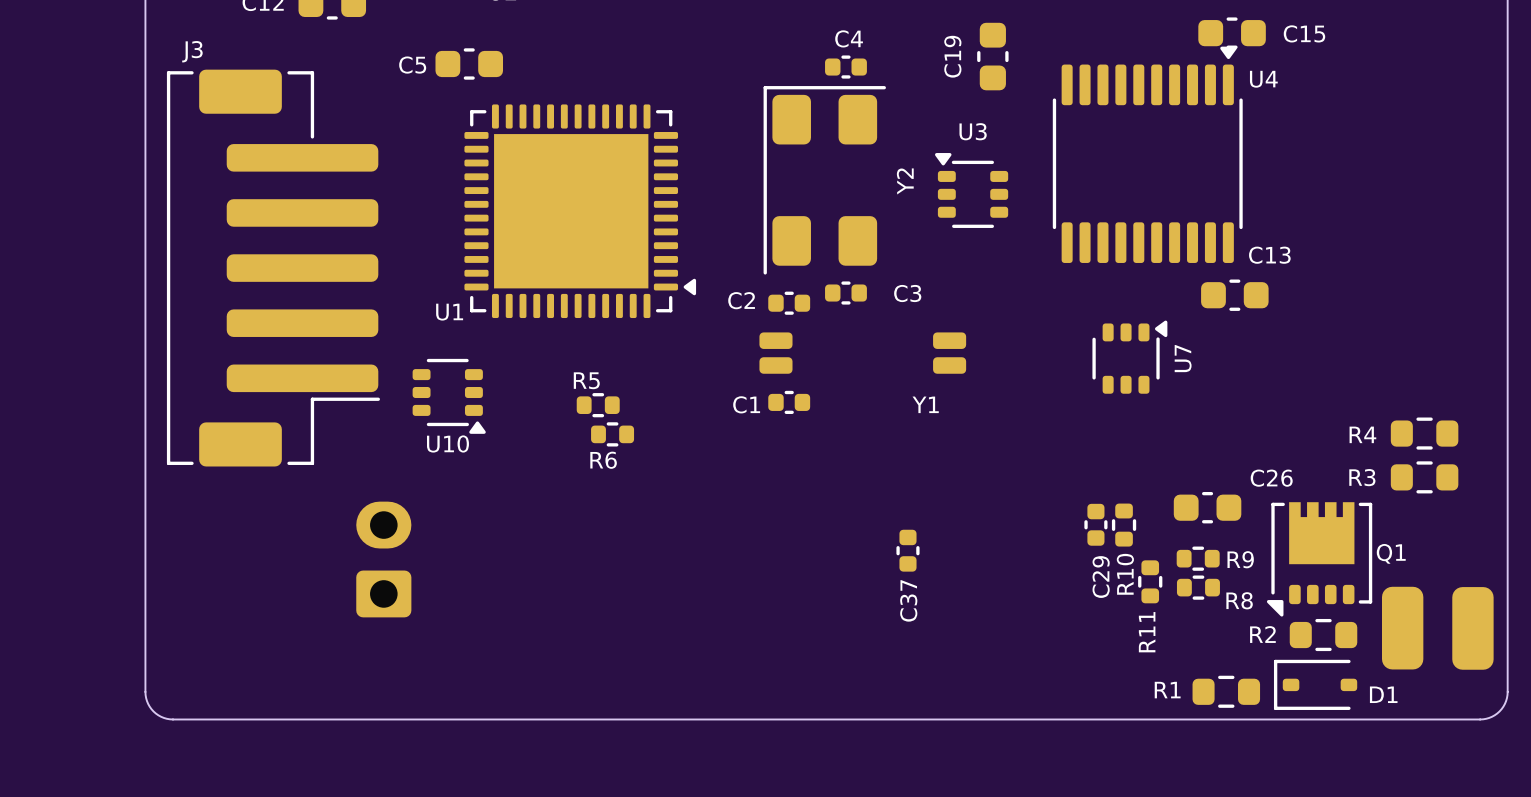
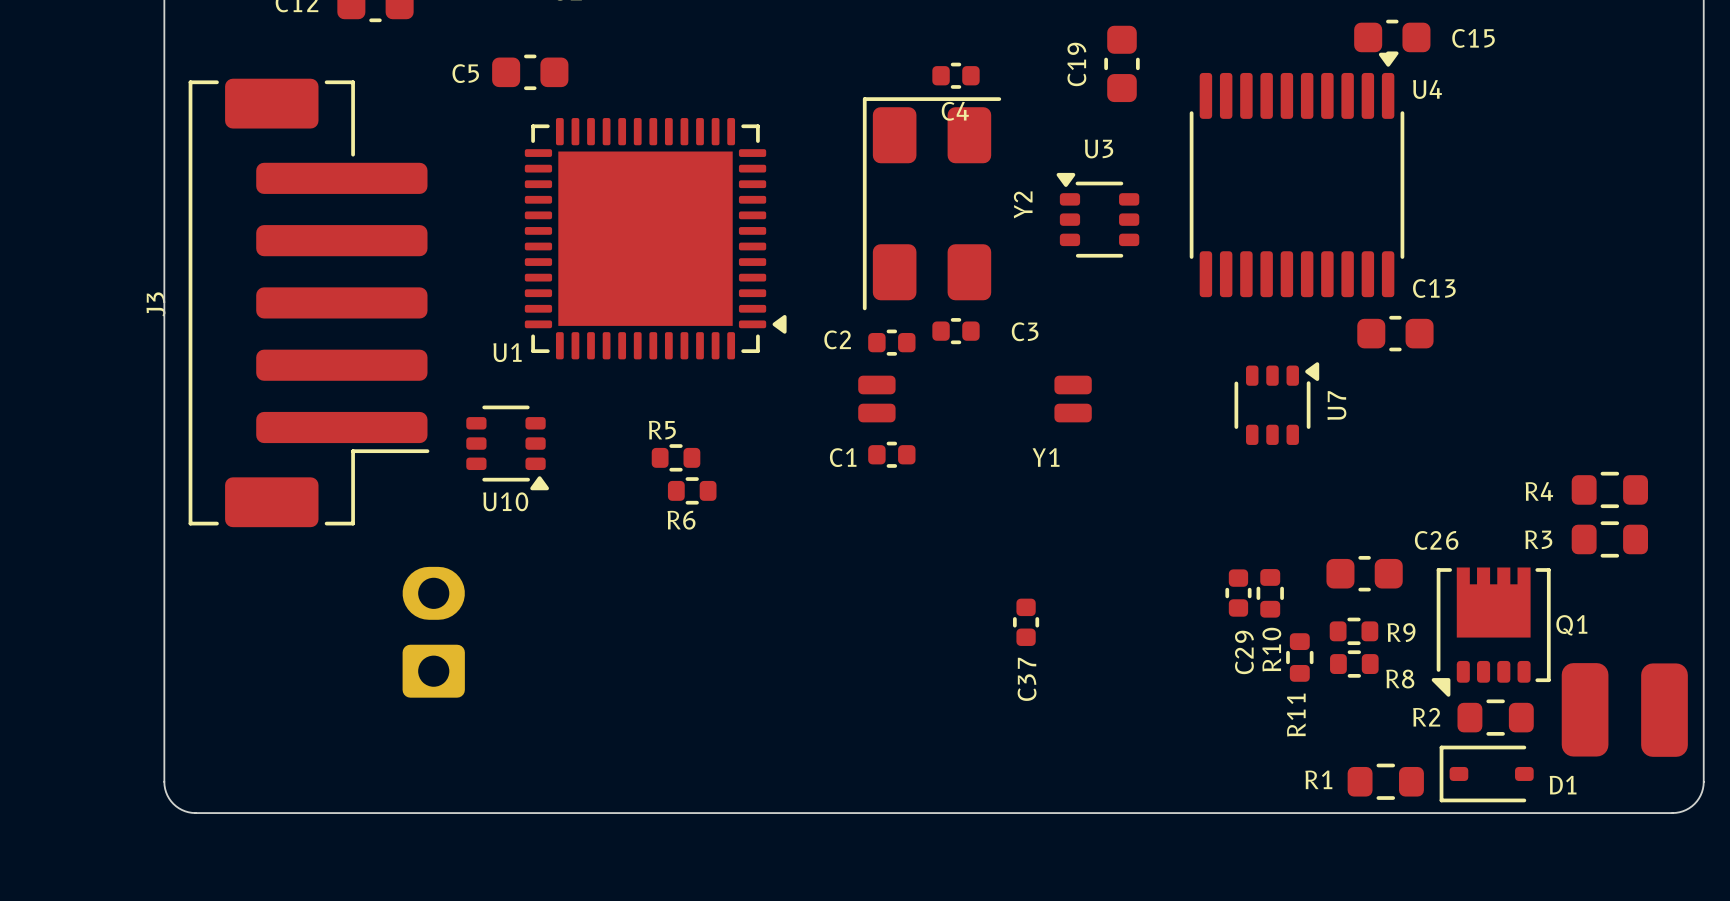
C4 name position: C4 (849, 38) -> C4 (955, 111)
J3 name rotation: 0° (192, 51) -> 90° counterclockwise (155, 304)
J3 name position: J3 (192, 51) -> J3 (155, 304)

